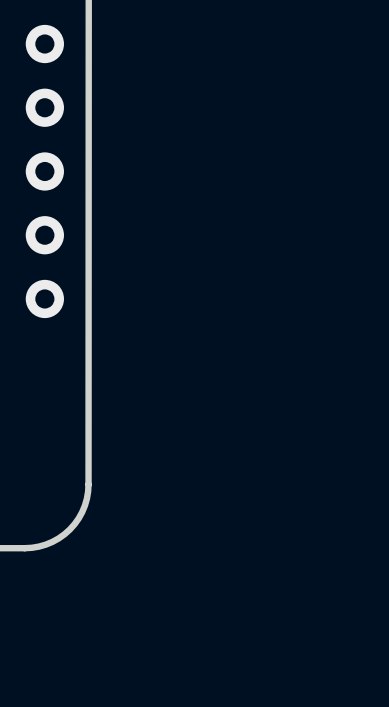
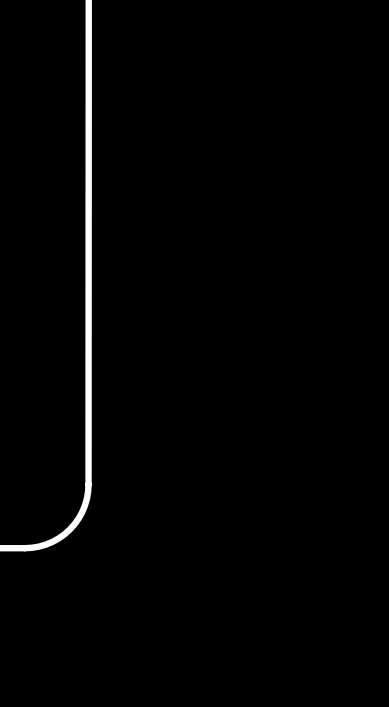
via: (44, 44) -> none
via: (44, 107) -> none
via: (44, 171) -> none
via: (44, 235) -> none
via: (44, 298) -> none

